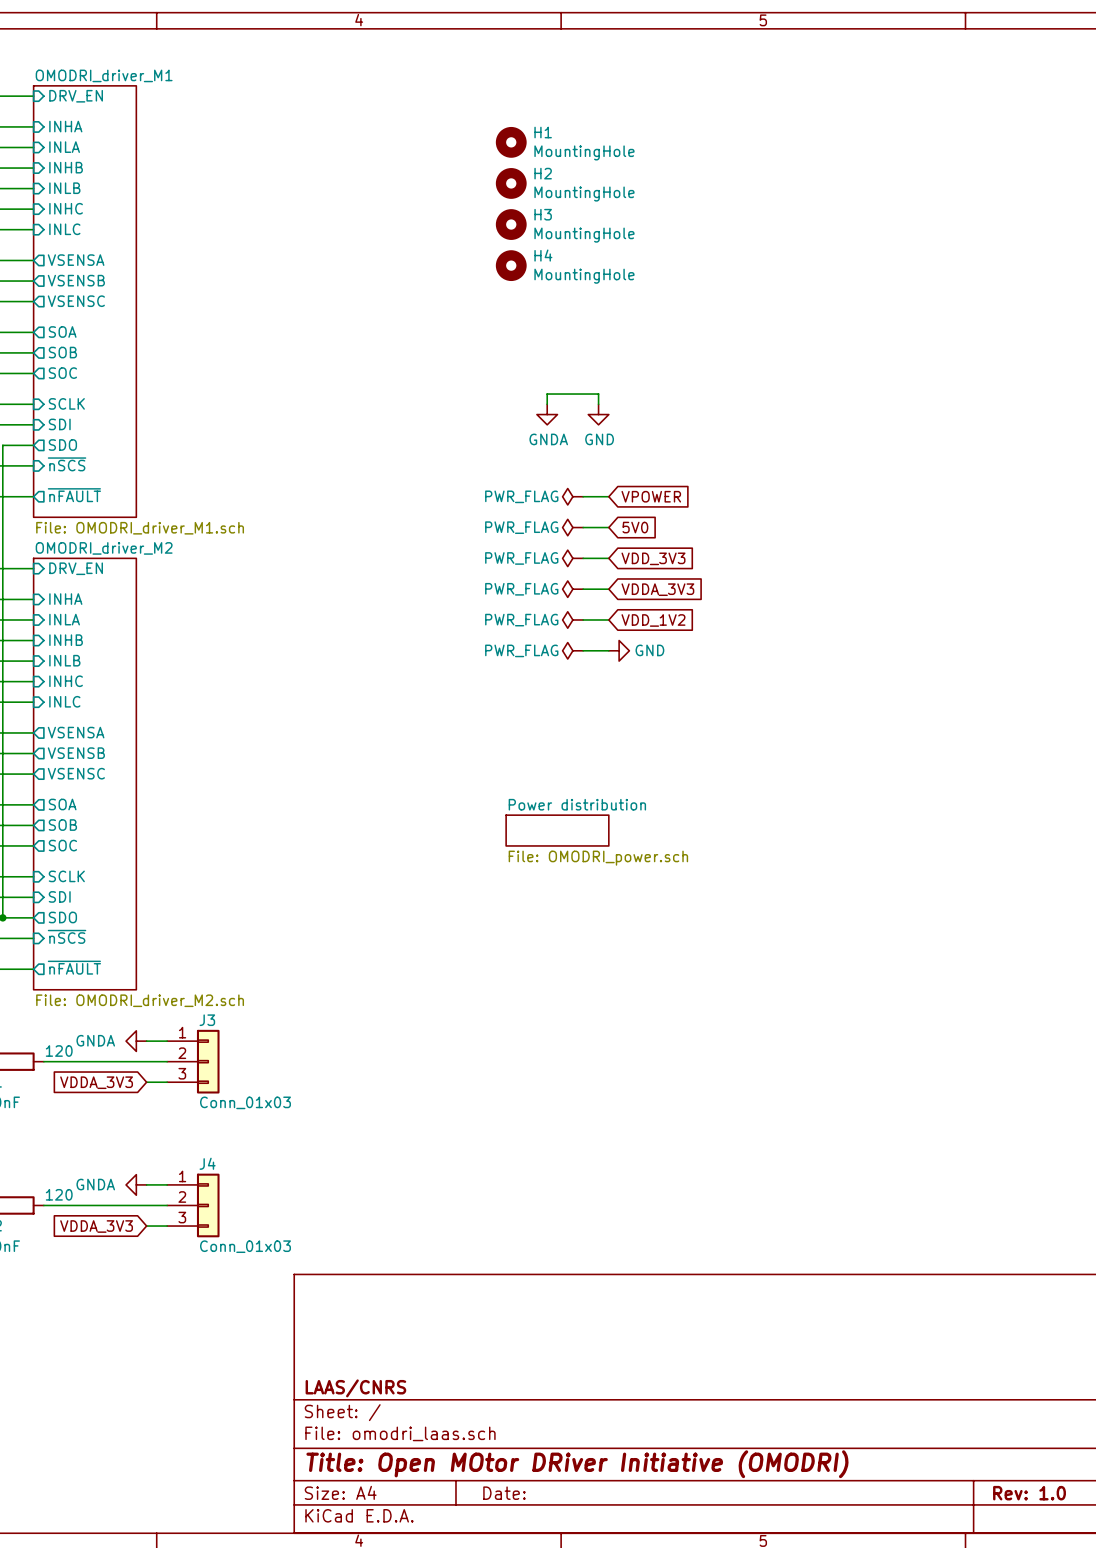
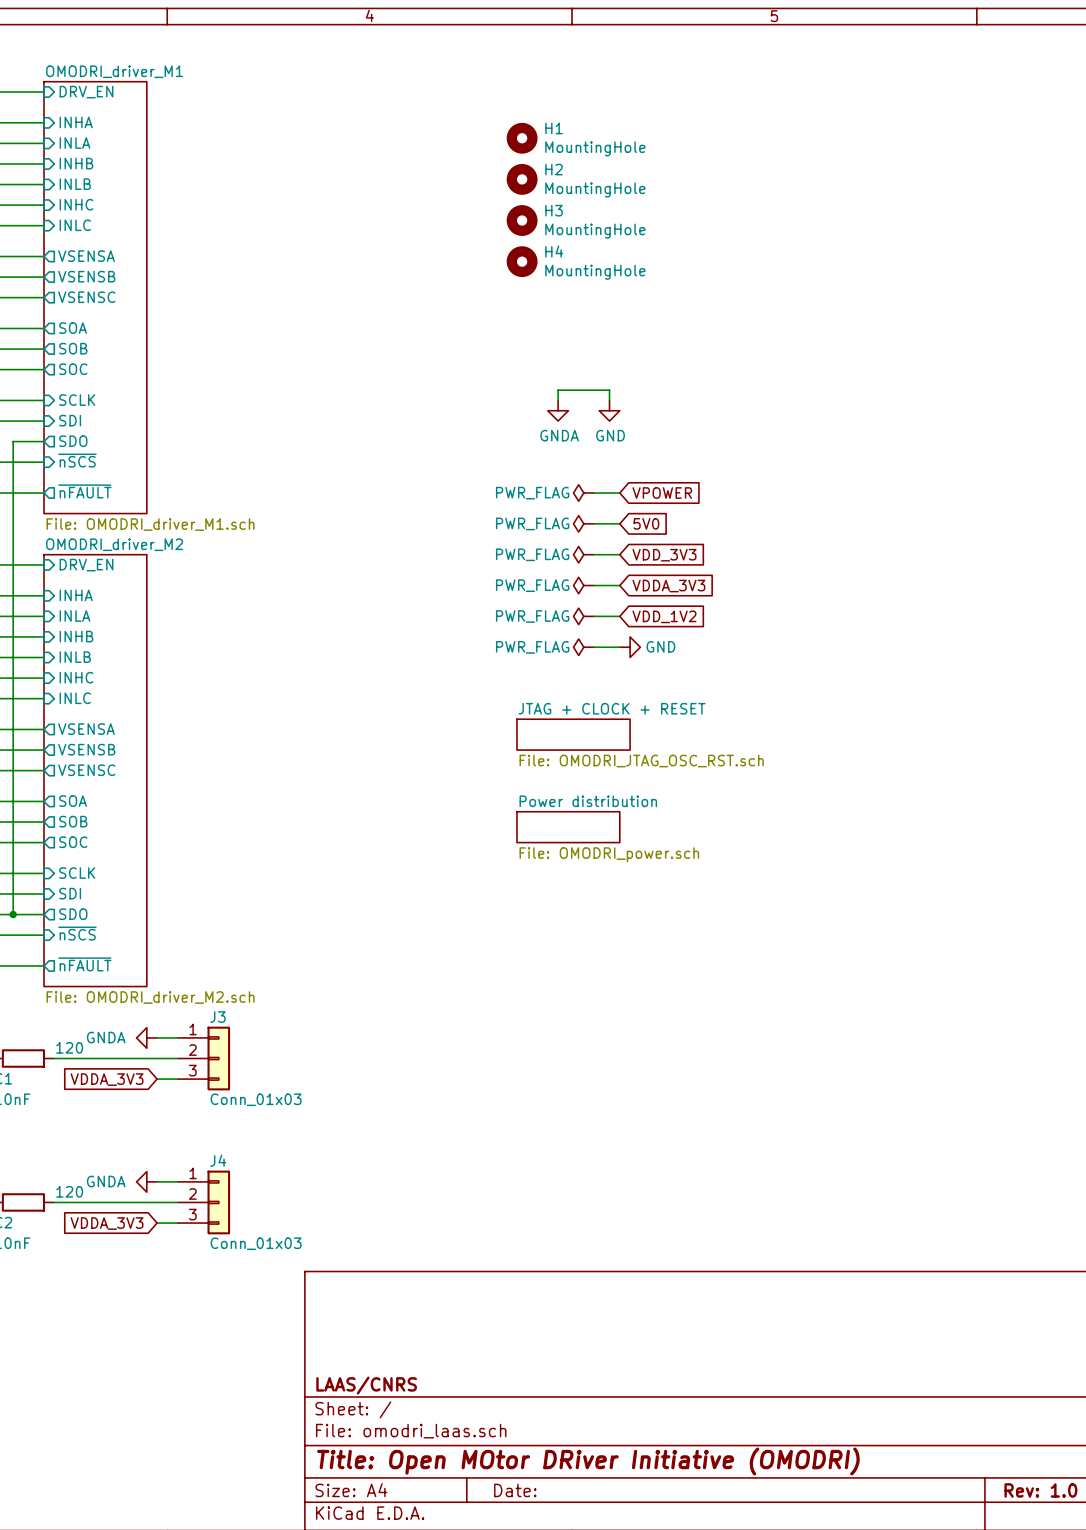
sheet JTAG + CLOCK + RESET: none -> File: OMODRI_JTAG_OSC_RST.sch (573, 734)

